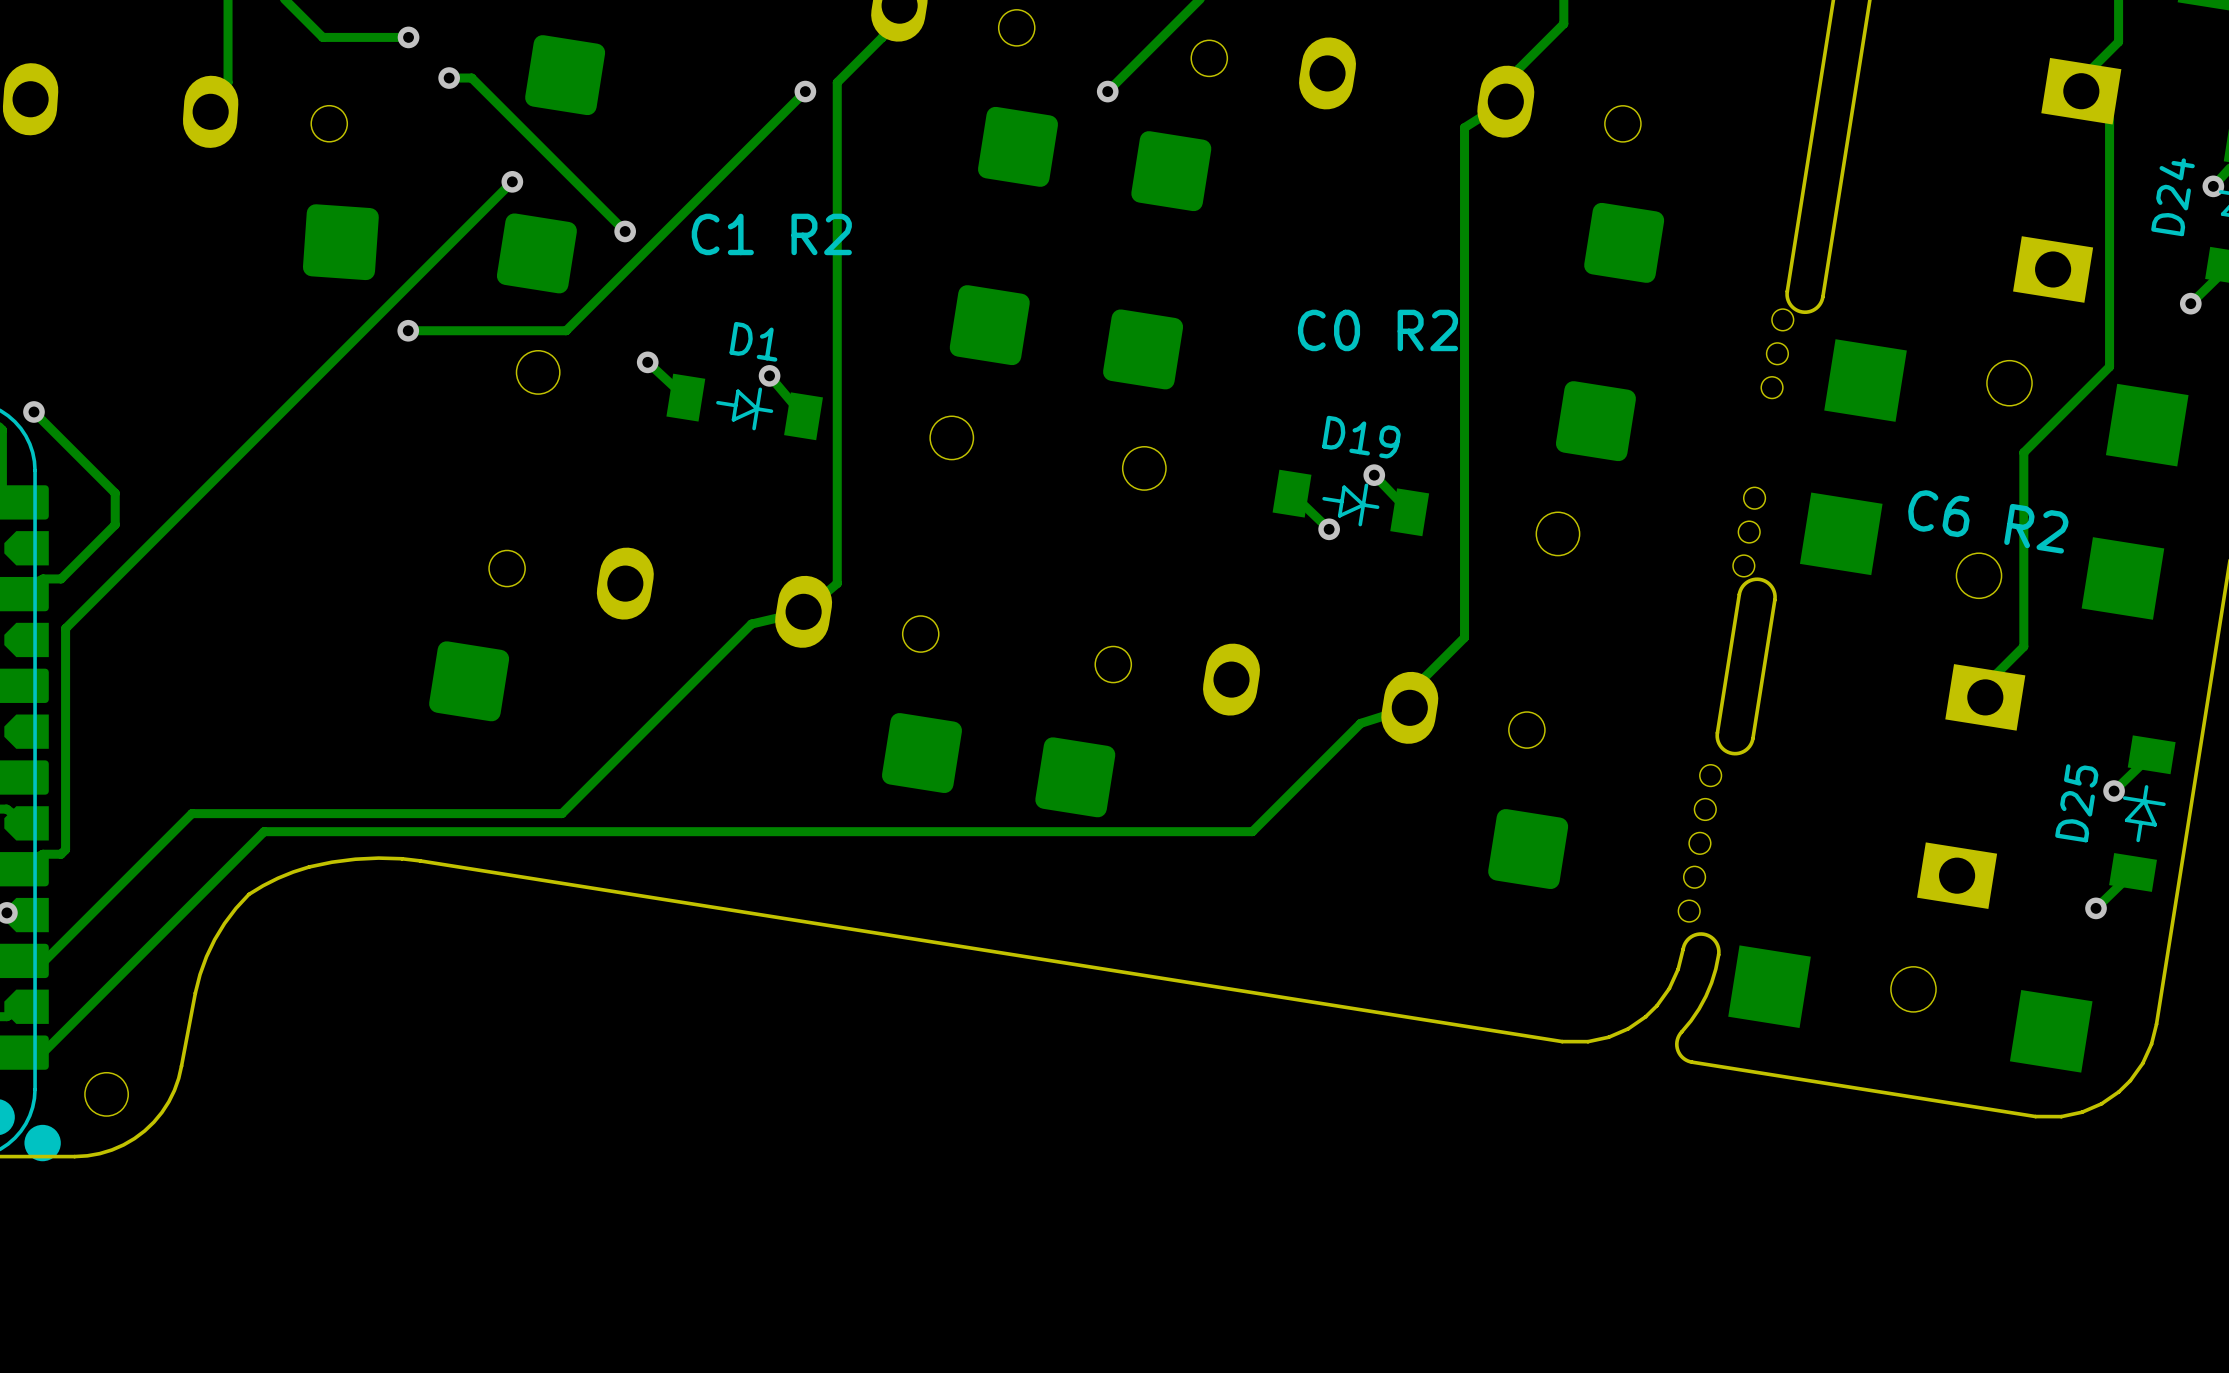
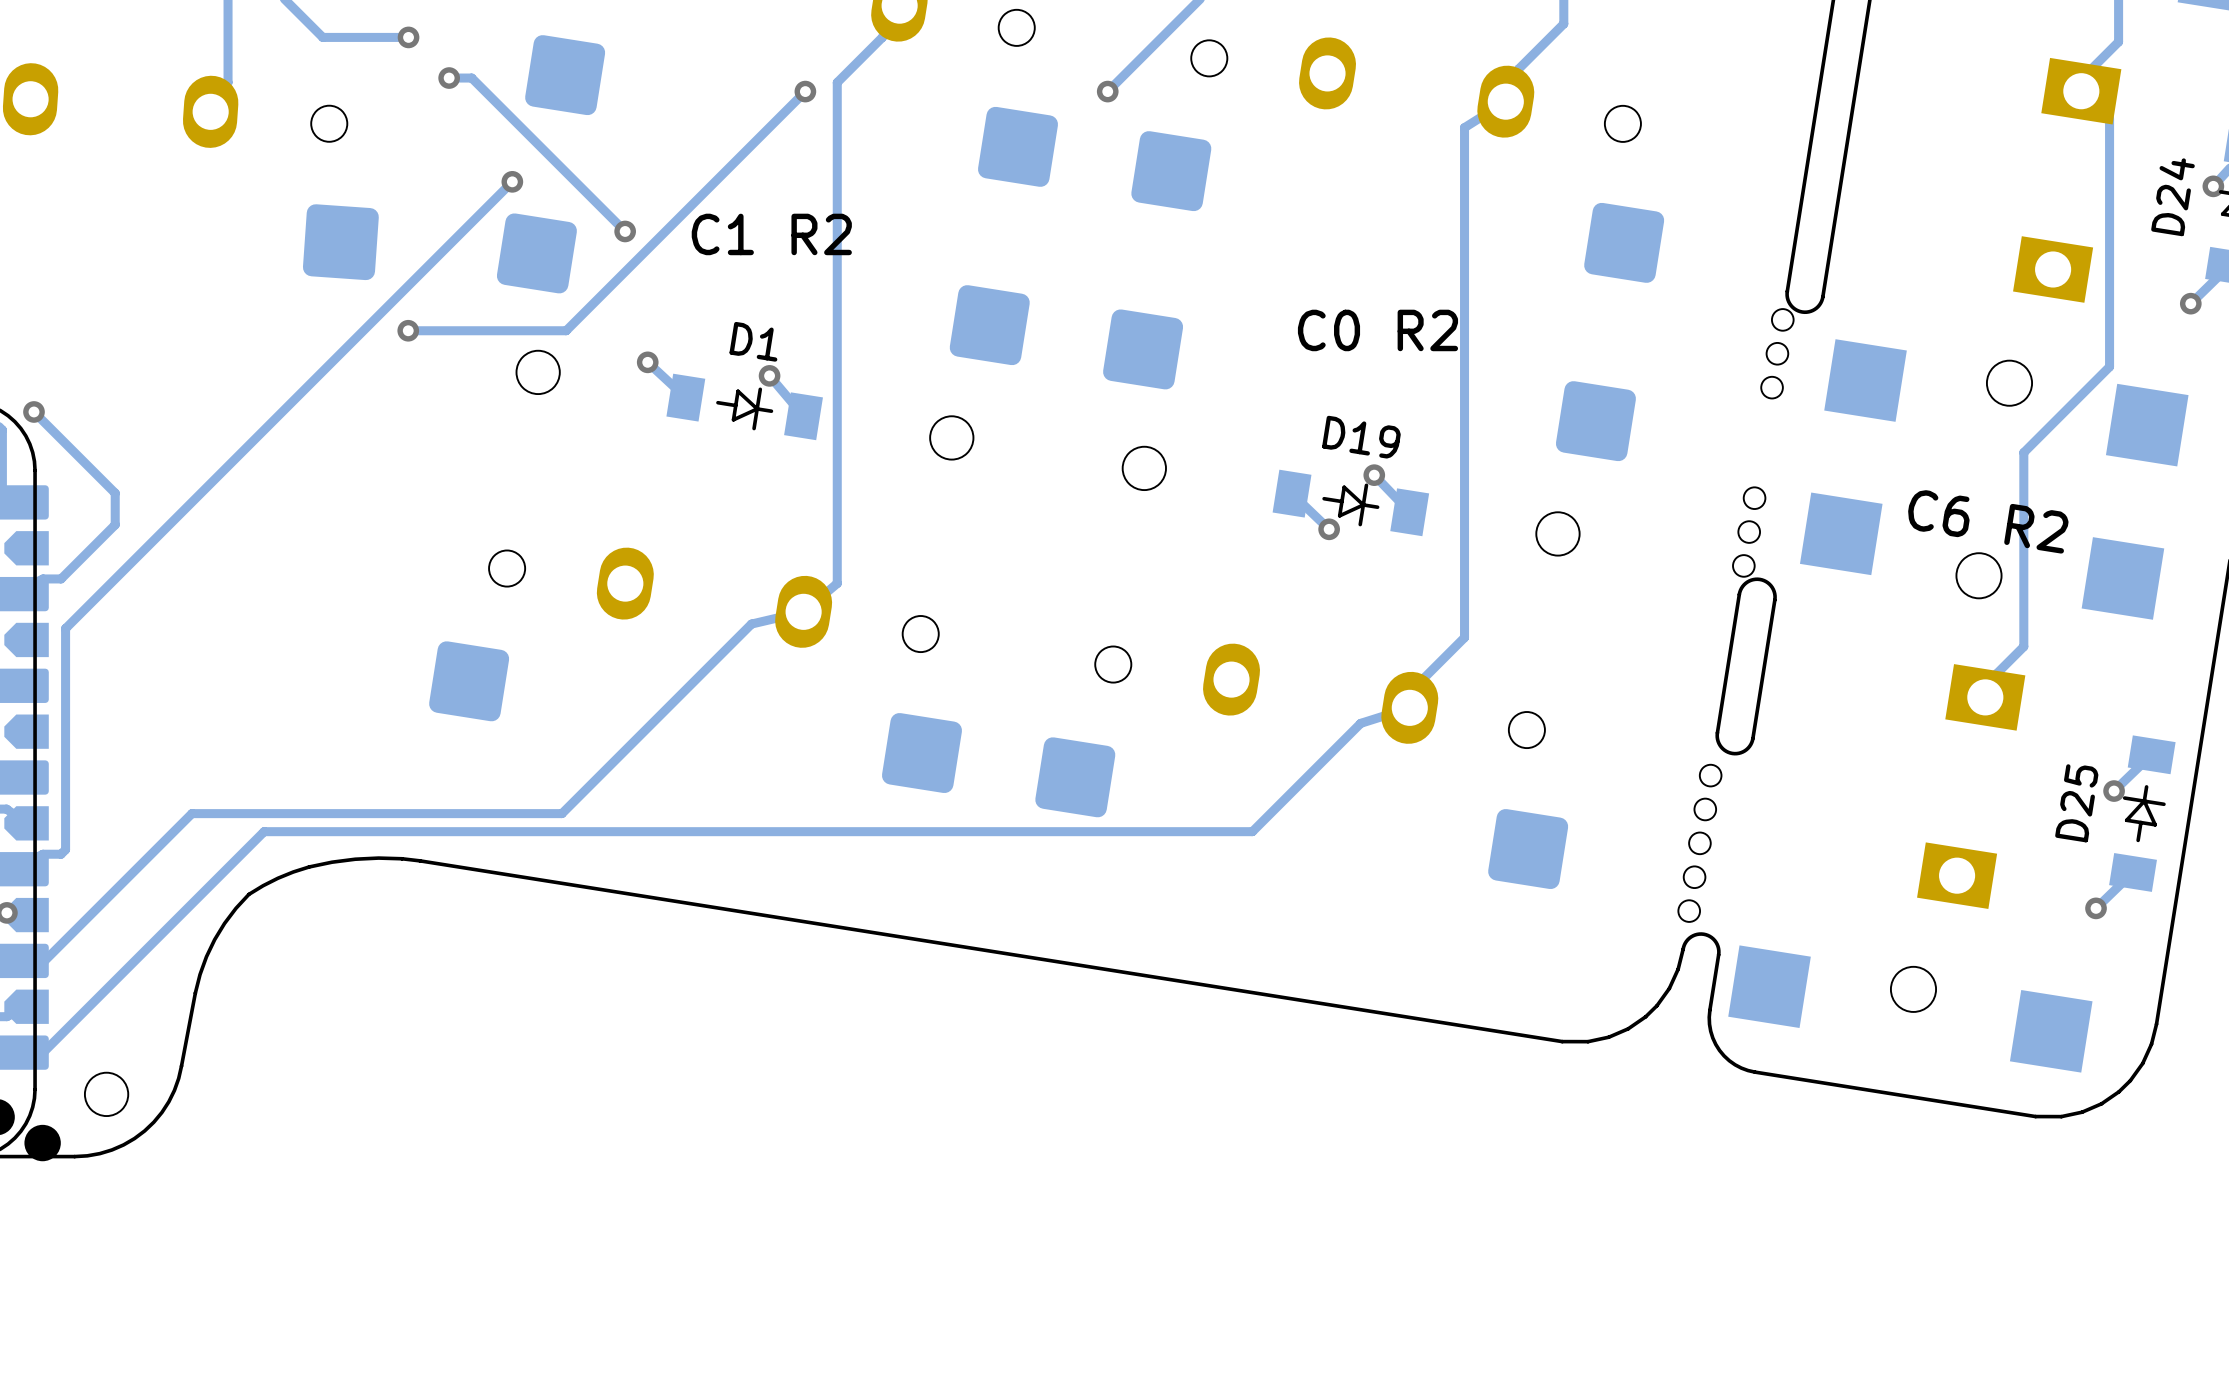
board edge: (1718, 954) (1705, 996) (1678, 1037) (1677, 1050) (1682, 1057) (1689, 1061) (1754, 1072) -> (1718, 954) (1709, 1010) (1710, 1031) (1715, 1044) (1729, 1060) (1741, 1068) (1754, 1072)

